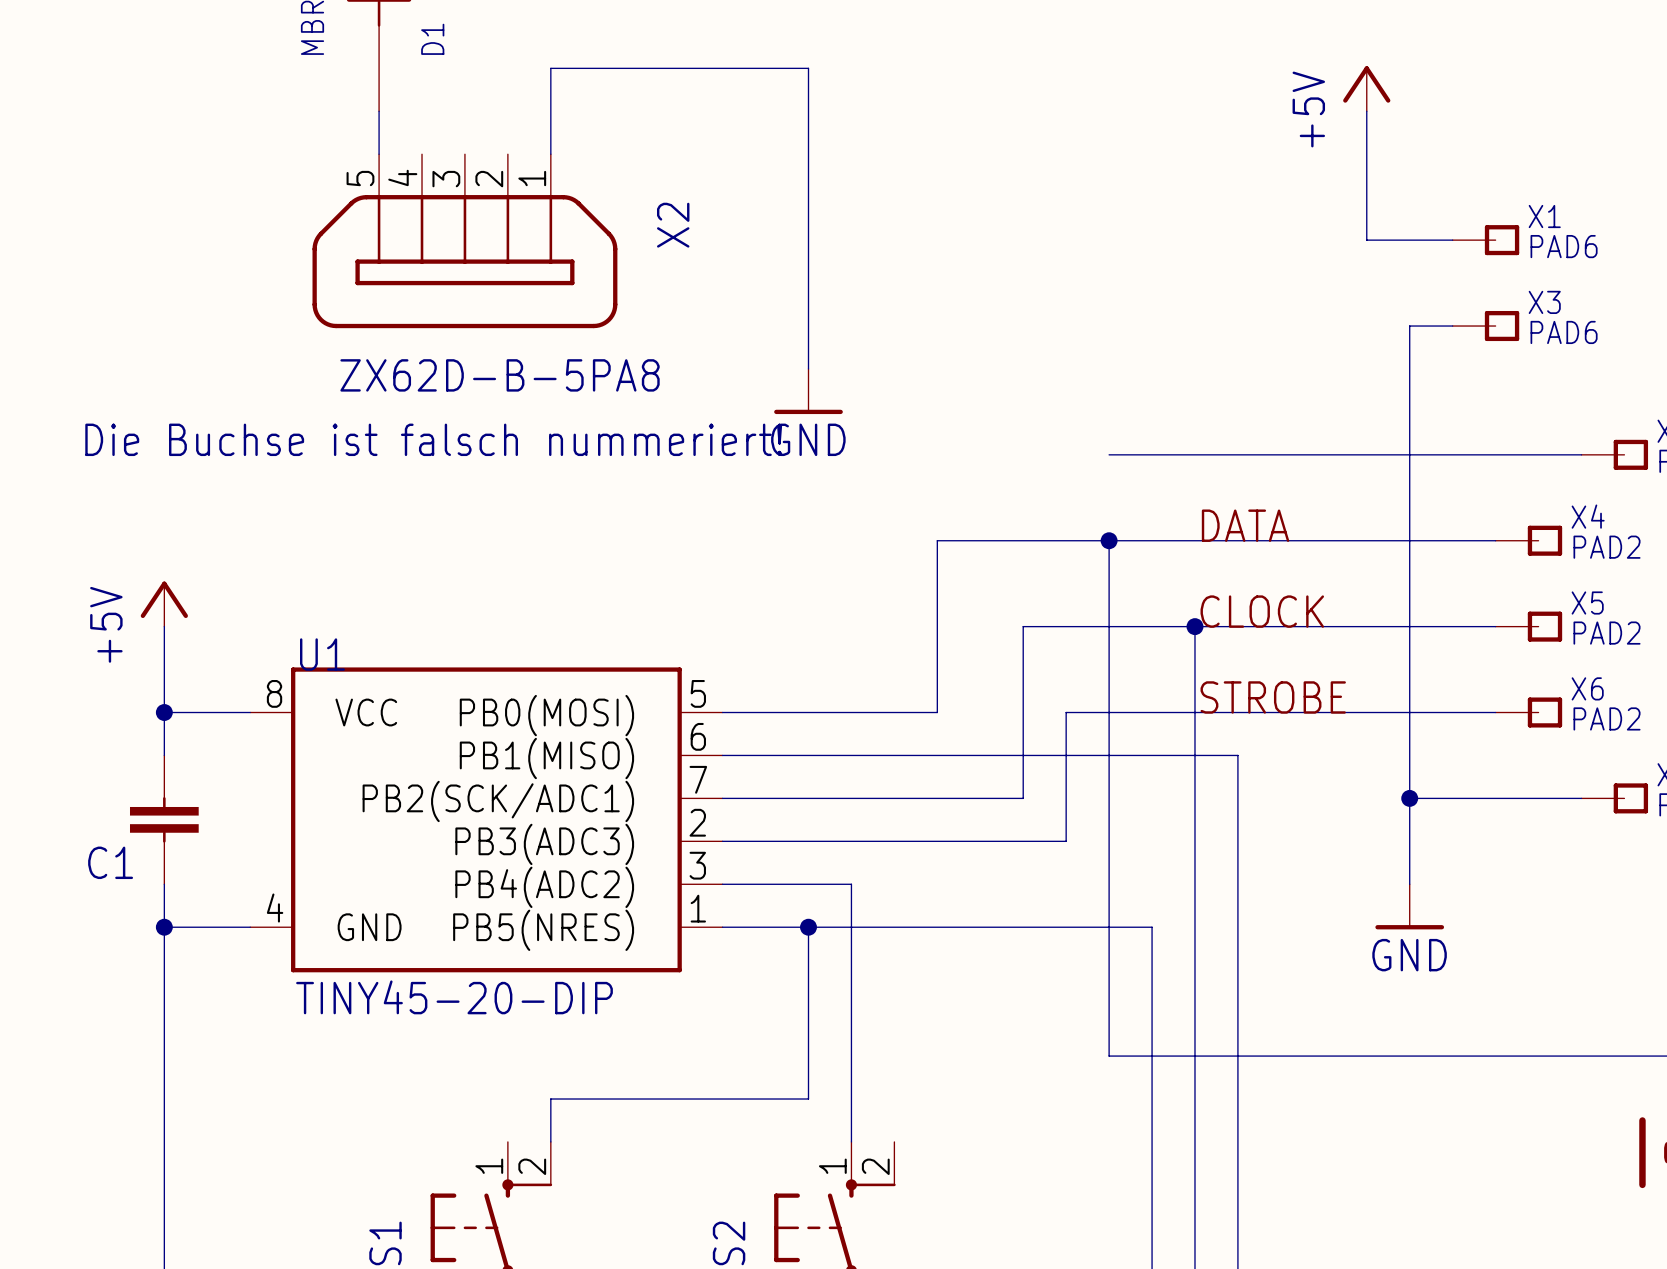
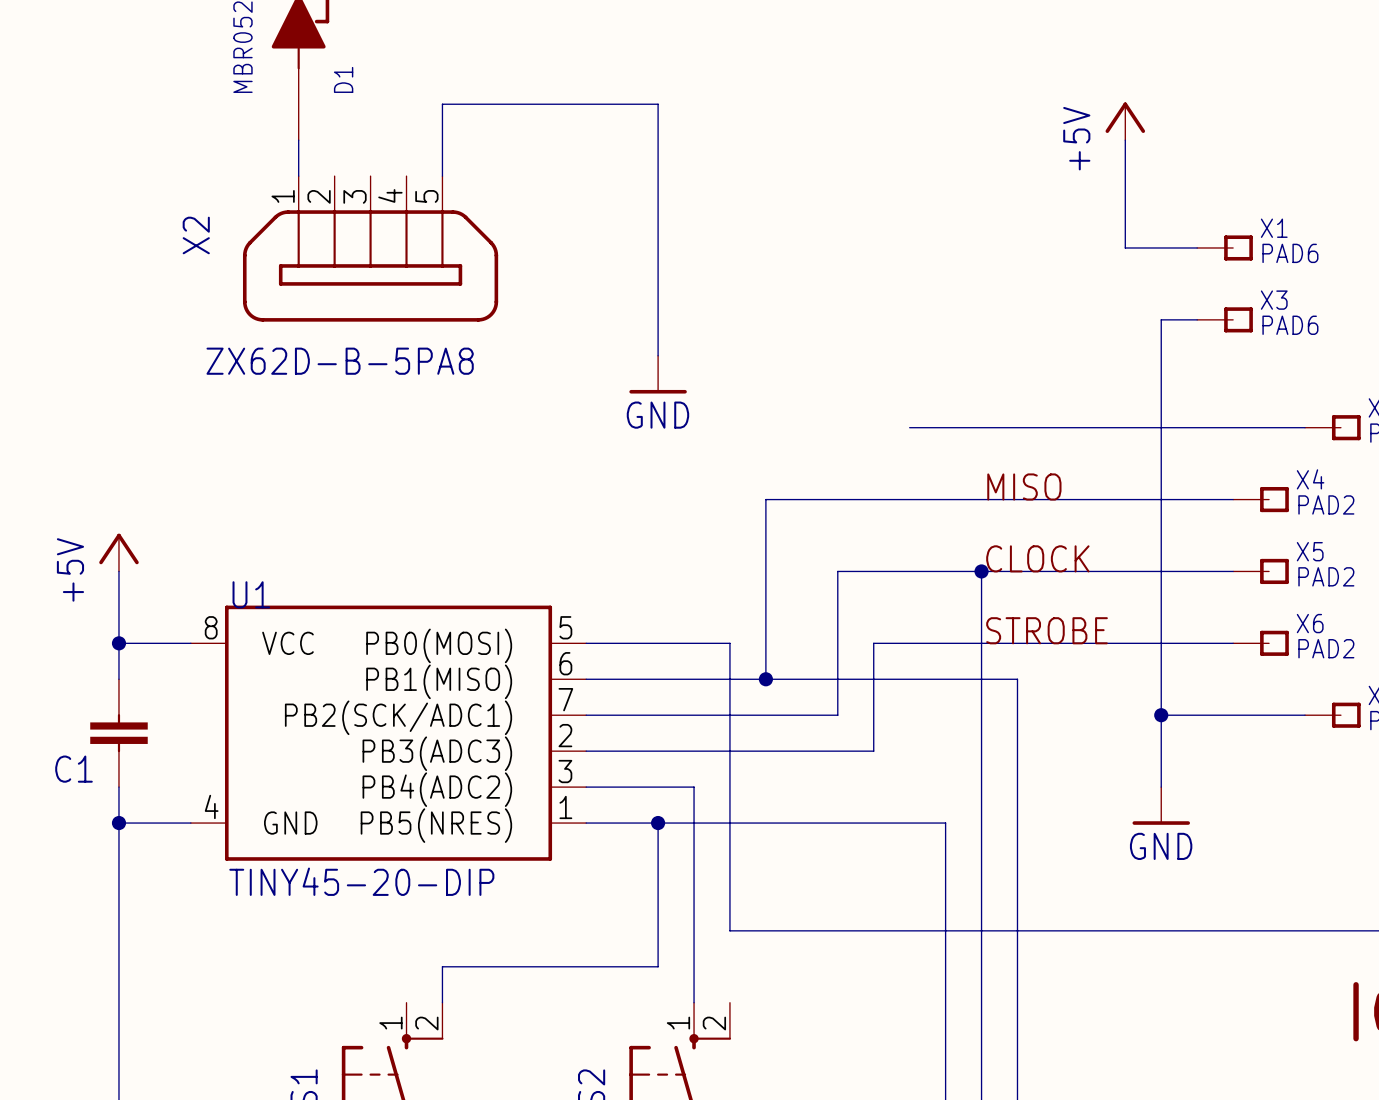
X2 flip: as is (464, 261) -> left-right (370, 265)
text: Die Buchse ist falsch nummeriert! (433, 439) -> none
label: DATA (1245, 525) -> MISO (1024, 486)
wire: (1109, 540) (1109, 1056) -> (729, 643) (729, 930) (909, 930)
junction: (1109, 540) -> none
wire: (894, 712) (937, 712) -> (765, 679) (765, 643)
junction: none -> (765, 679)

